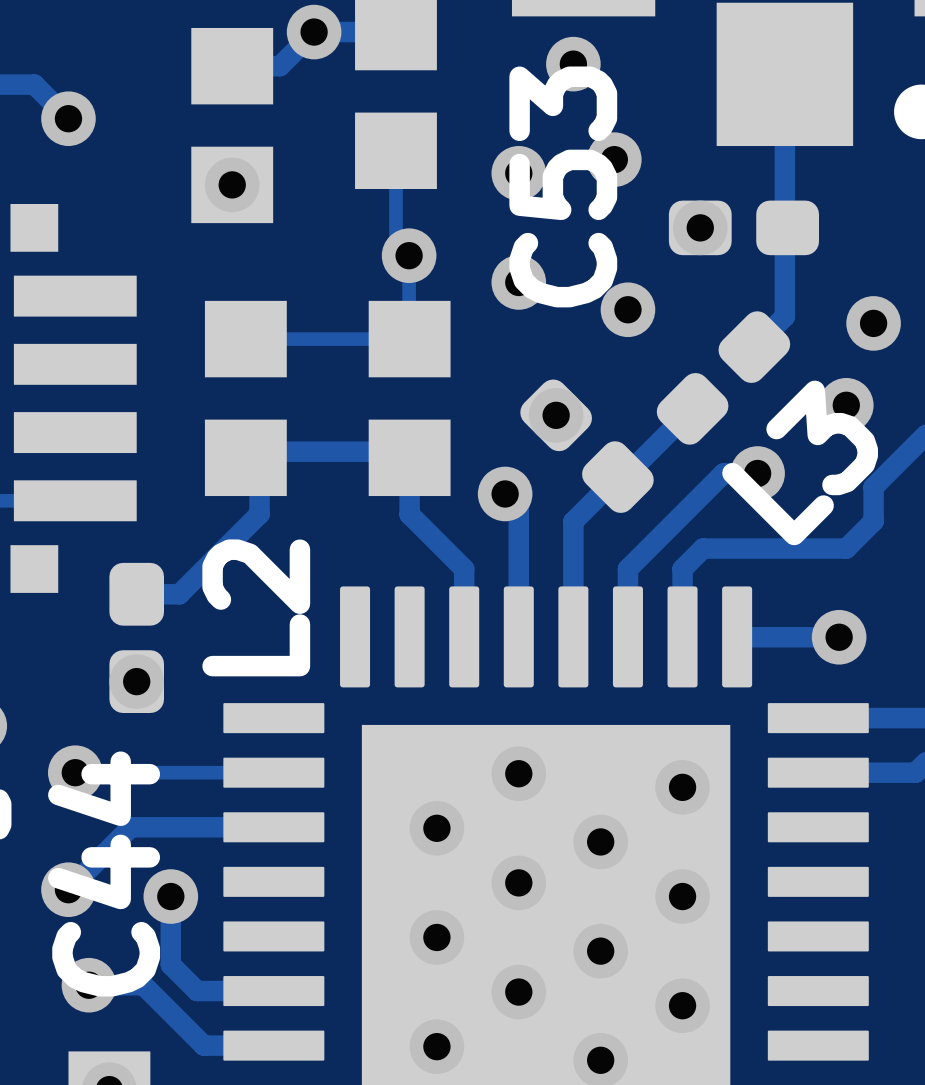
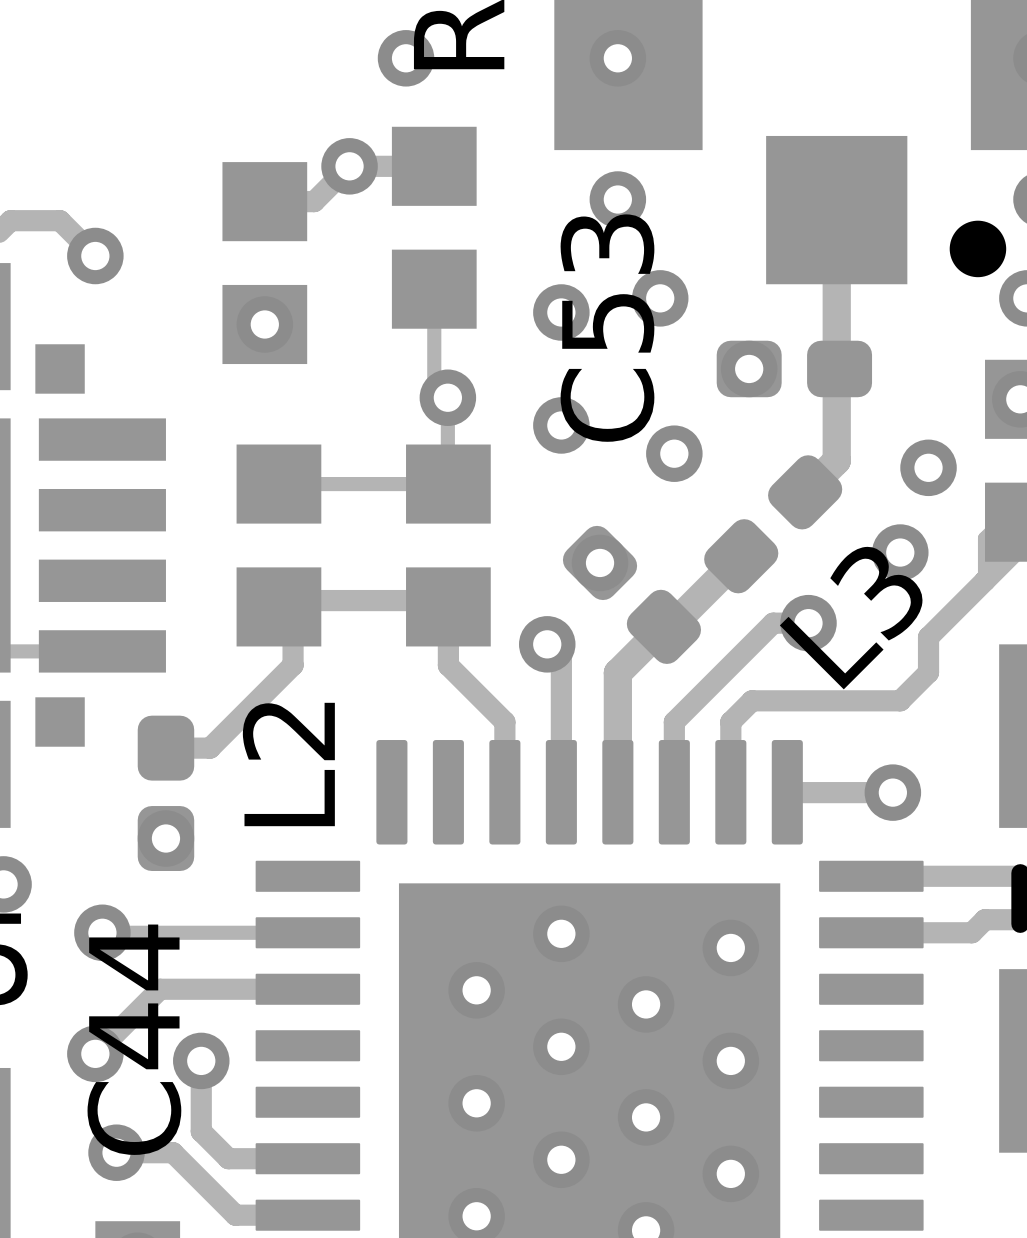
track width: thin (784, 74) (784, 225) (787, 227) (784, 230) (784, 316) (754, 347) -> thick (836, 210) (836, 366) (839, 368) (836, 371) (836, 460) (805, 492)
track width: thin (692, 408) (631, 469) (625, 469) (573, 521) (573, 636) -> thick (741, 556) (678, 619) (671, 619) (617, 672) (617, 792)

